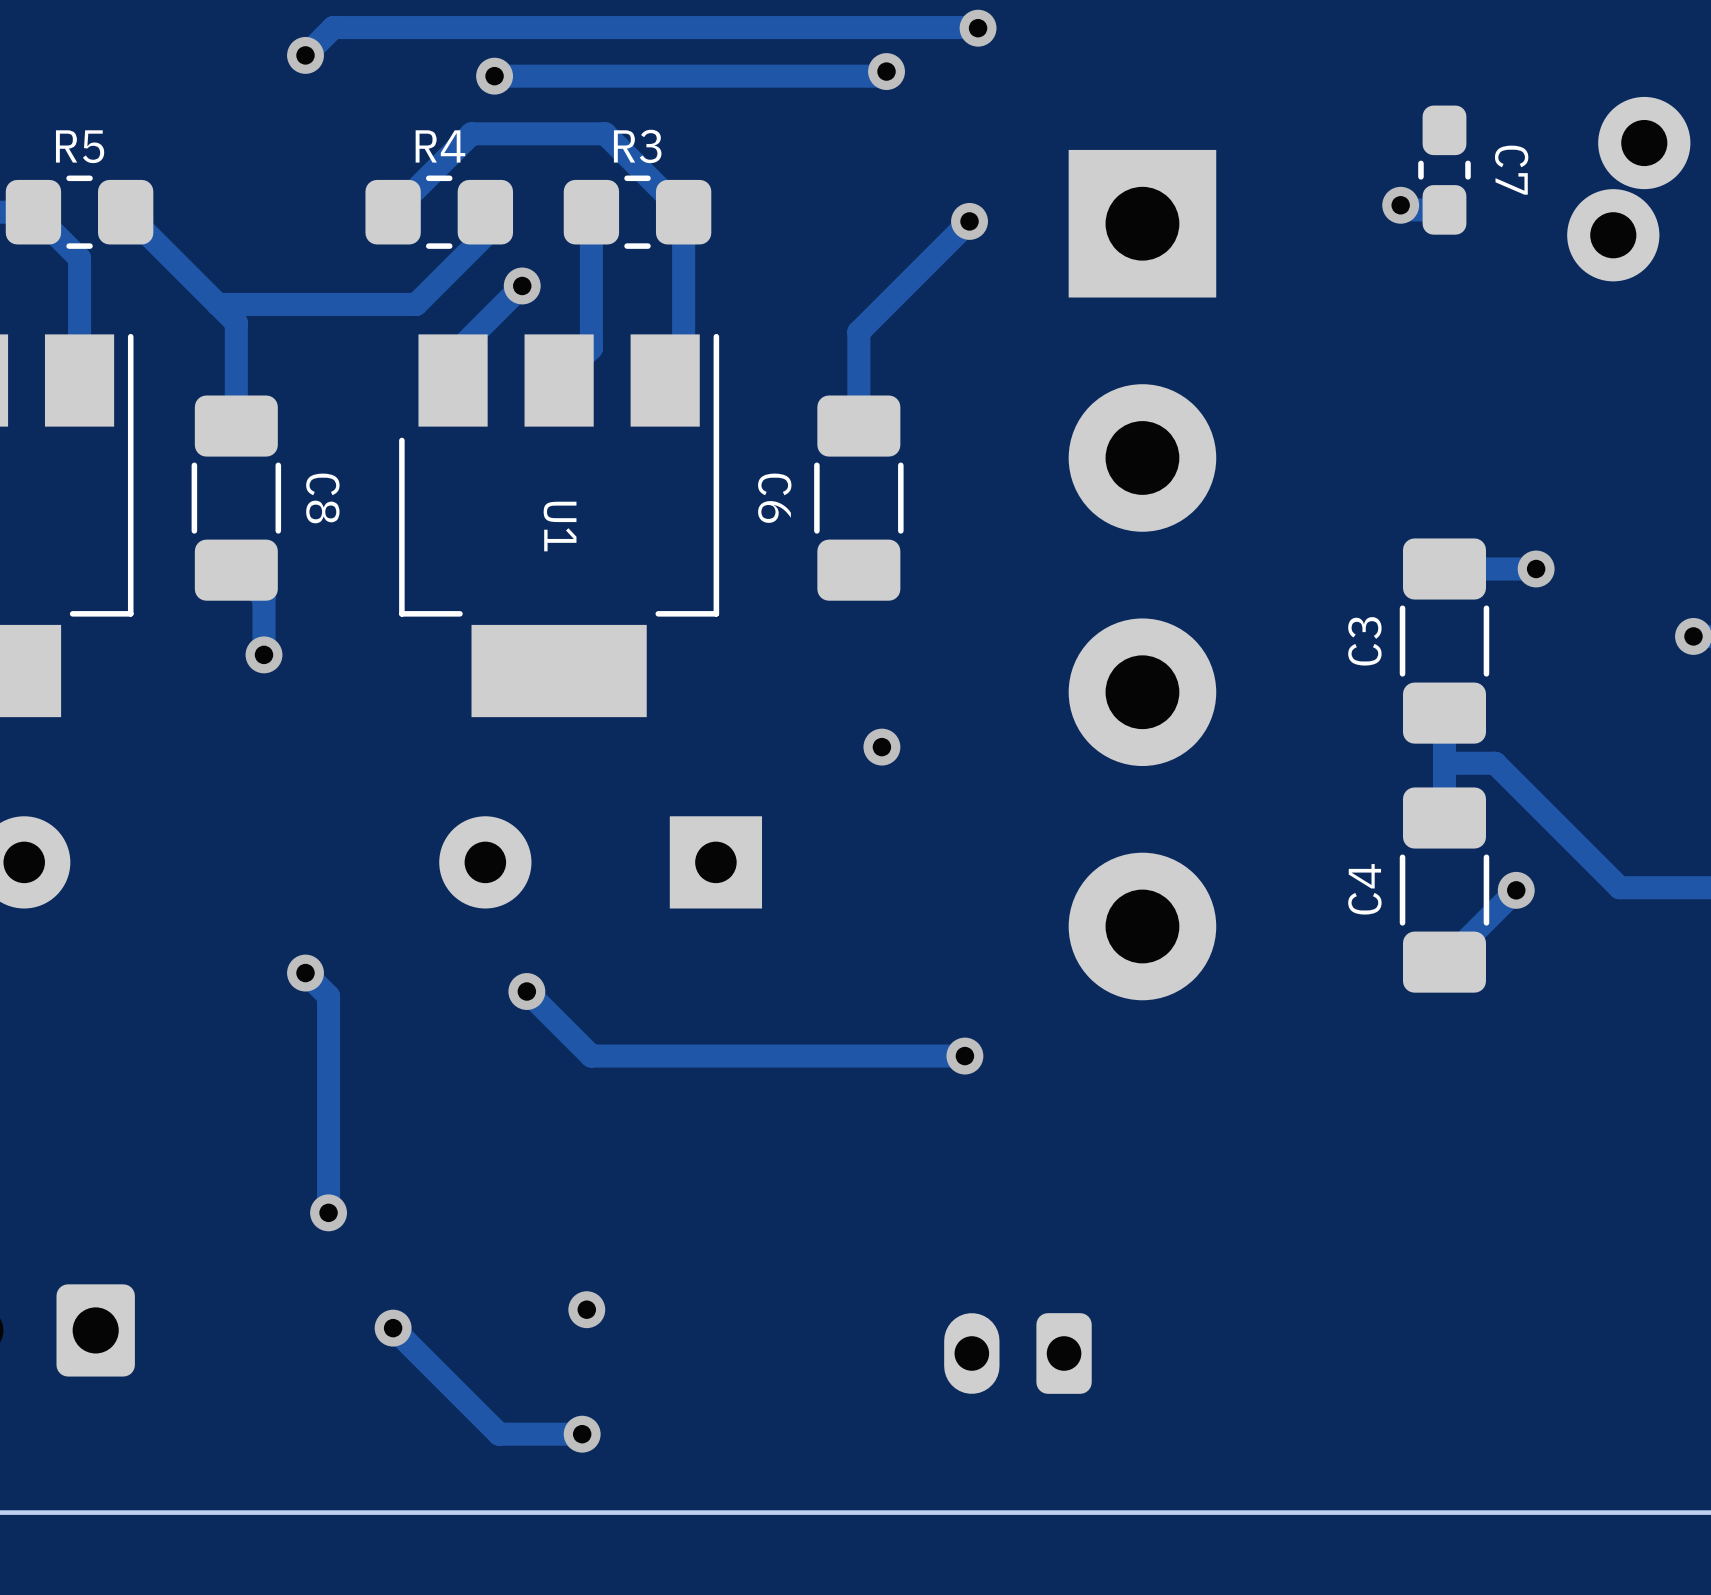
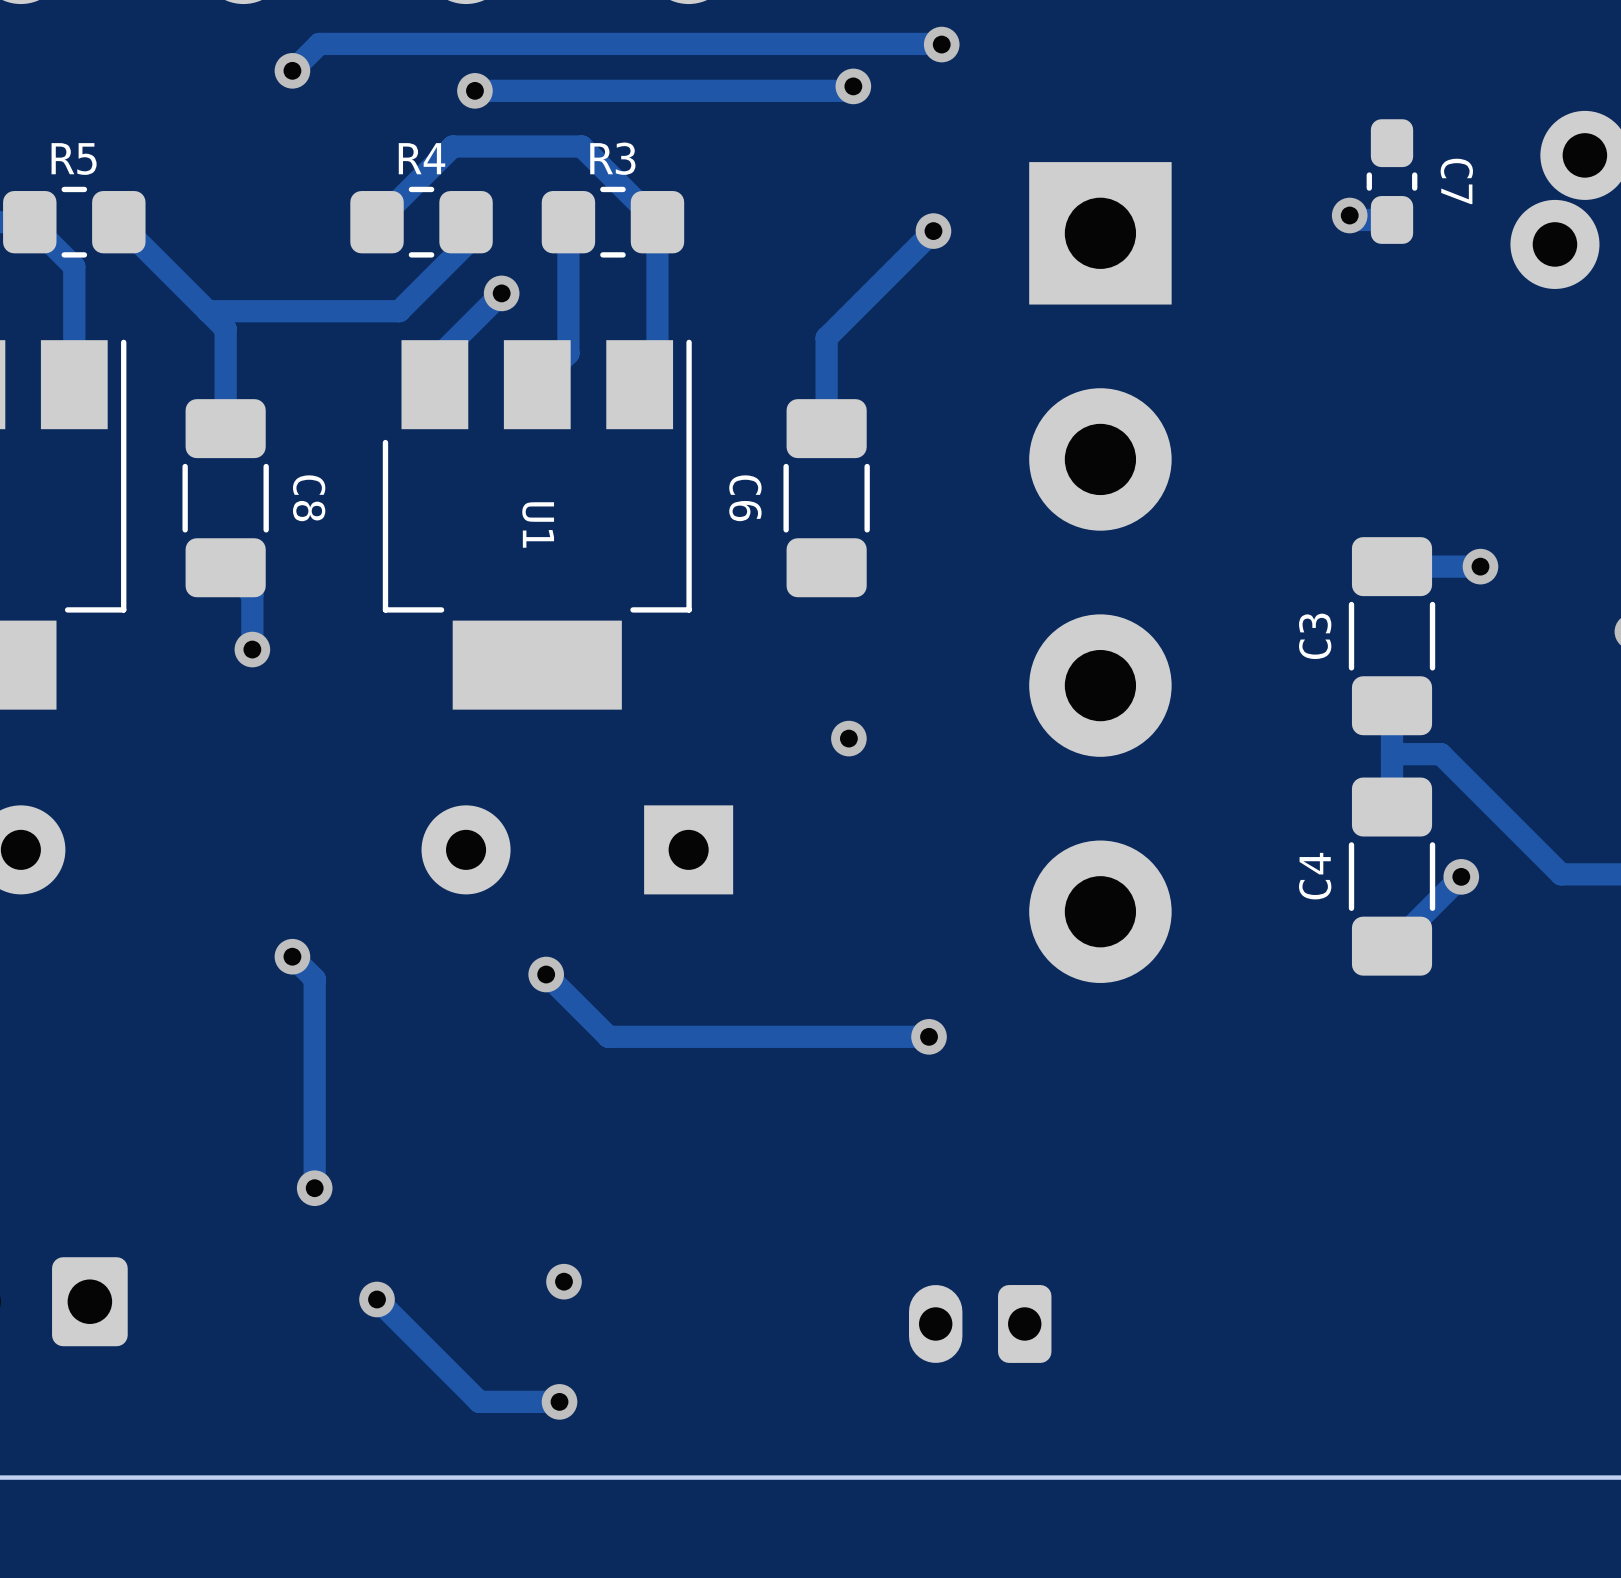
track: (526, 991) (591, 1056) (632, 1056) -> (546, 974) (608, 1036)
via position: (526, 991) -> (546, 974)

